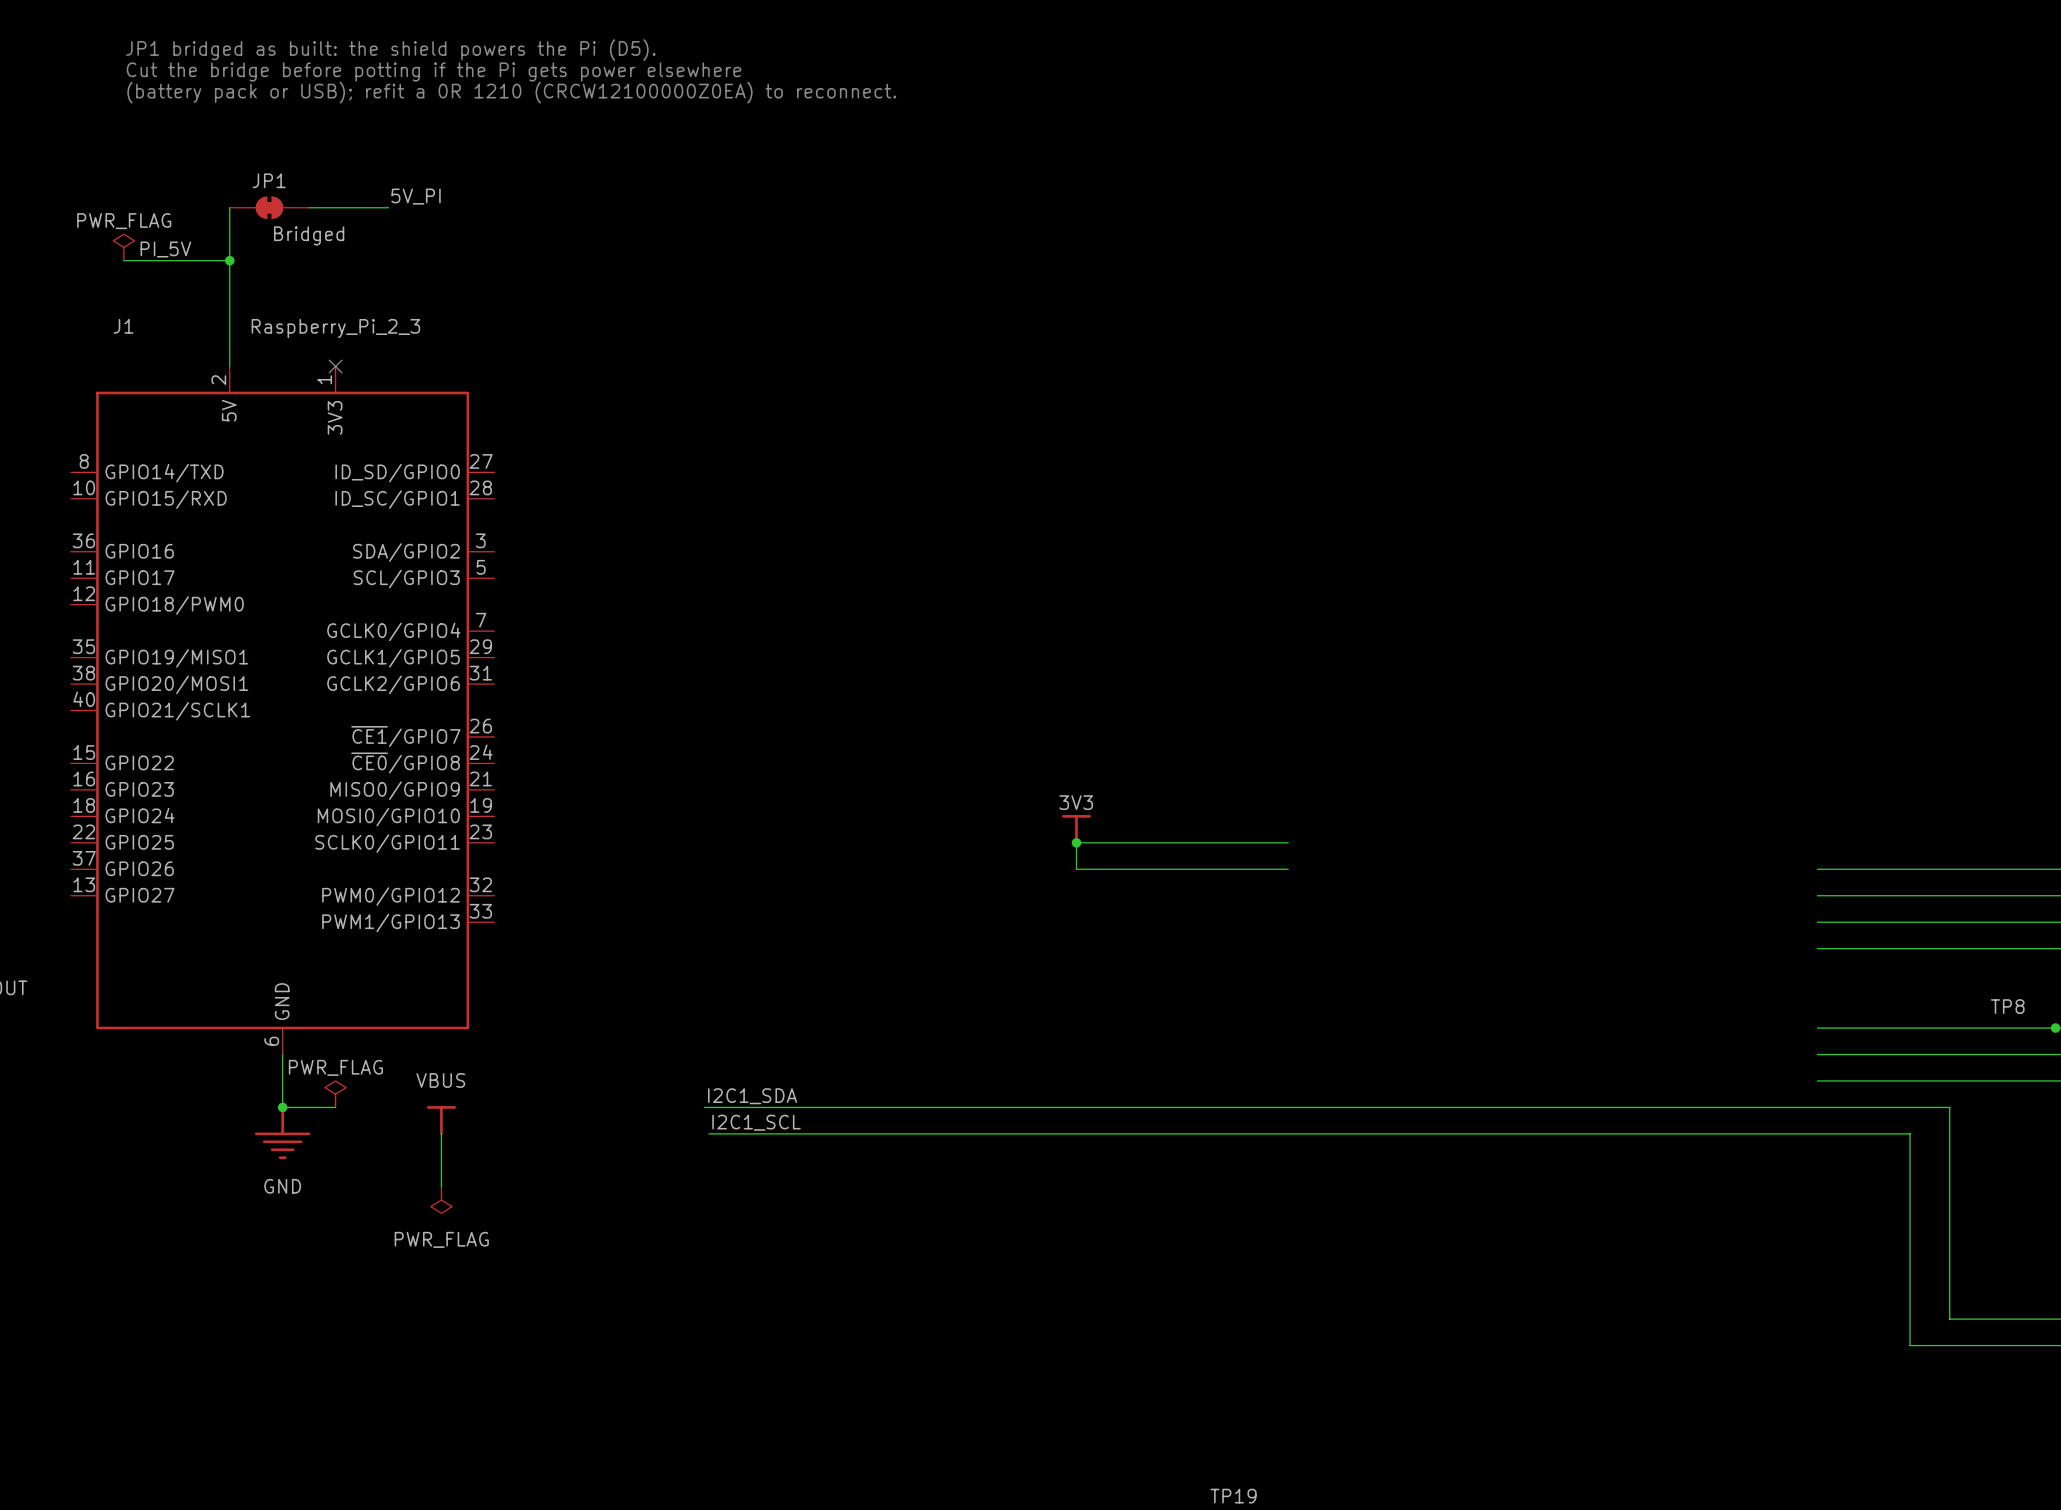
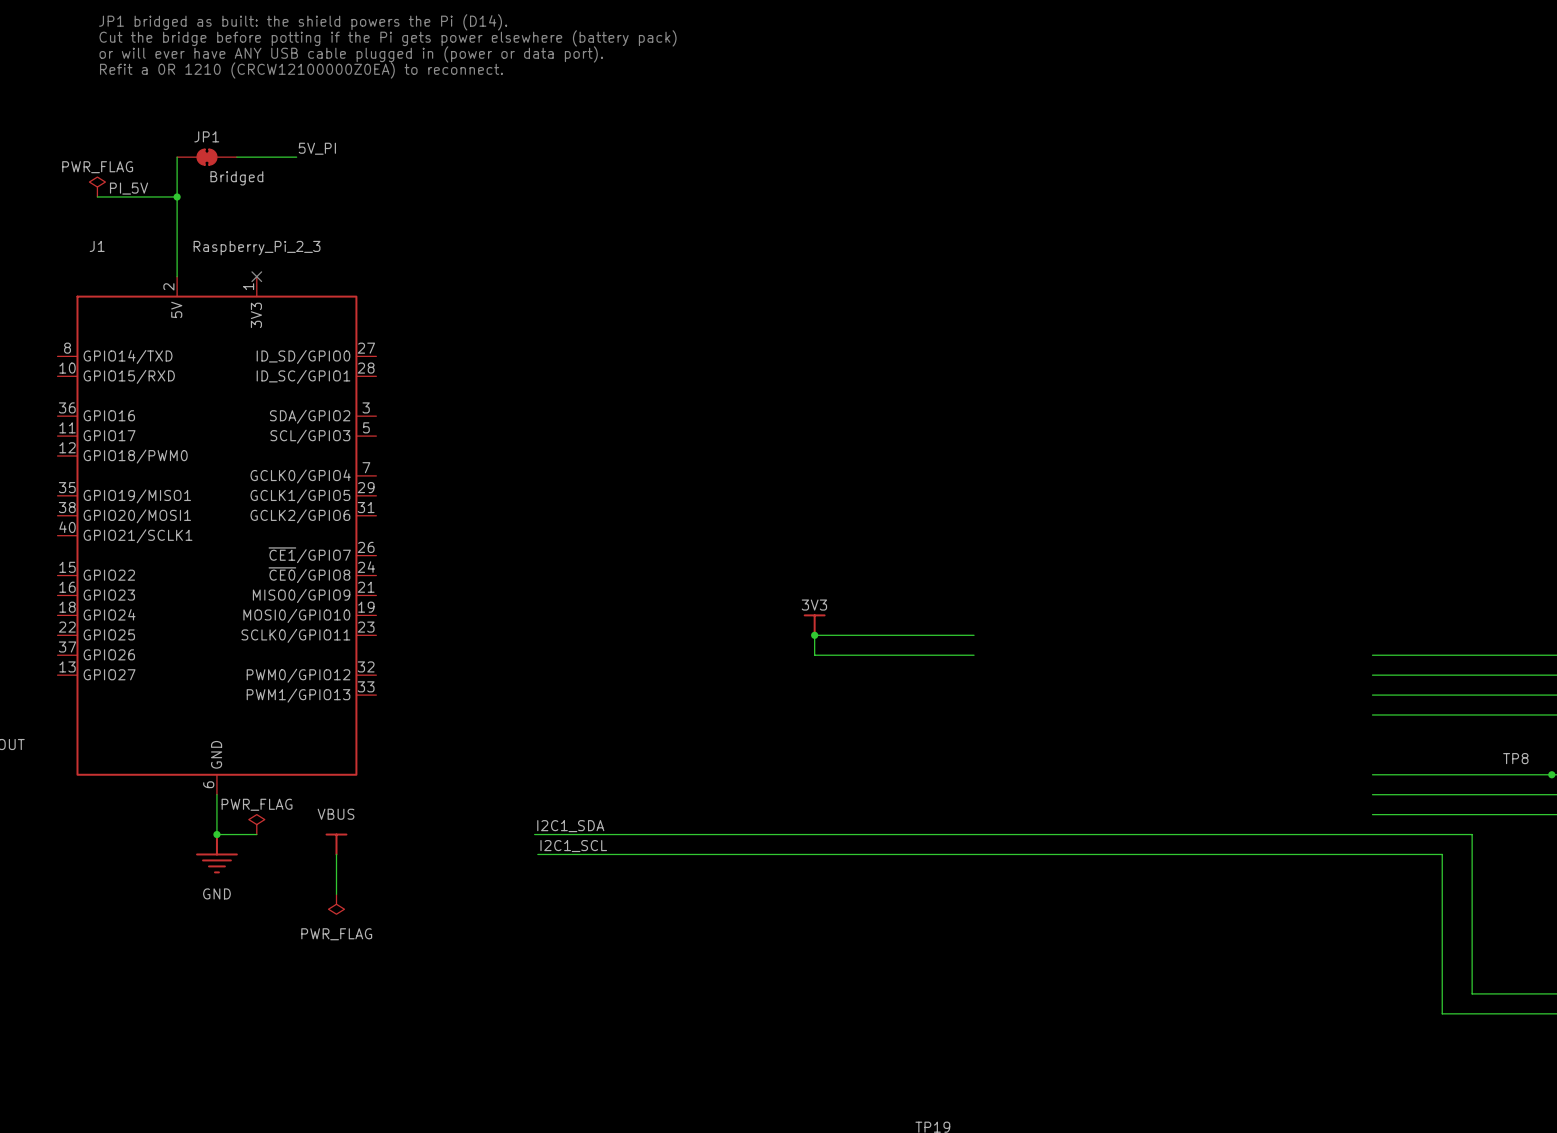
text: none -> JP1 bridged as built: the shield powers the Pi (D14). (303, 22)
text: JP1 bridged as built: the shield powers the Pi (D5). (390, 50) -> Cut the bridge before potting if the Pi gets power elsewhere (battery pack) (388, 38)
text: Cut the bridge before potting if the Pi gets power elsewhere (433, 71) -> or will ever have ANY USB cable plugged in (power or data port). (351, 54)
text: (battery pack or USB); refit a 0R 1210 (CRCW12100000Z0EA) to reconnect. (511, 92) -> Refit a 0R 1210 (CRCW12100000Z0EA) to reconnect. (301, 70)

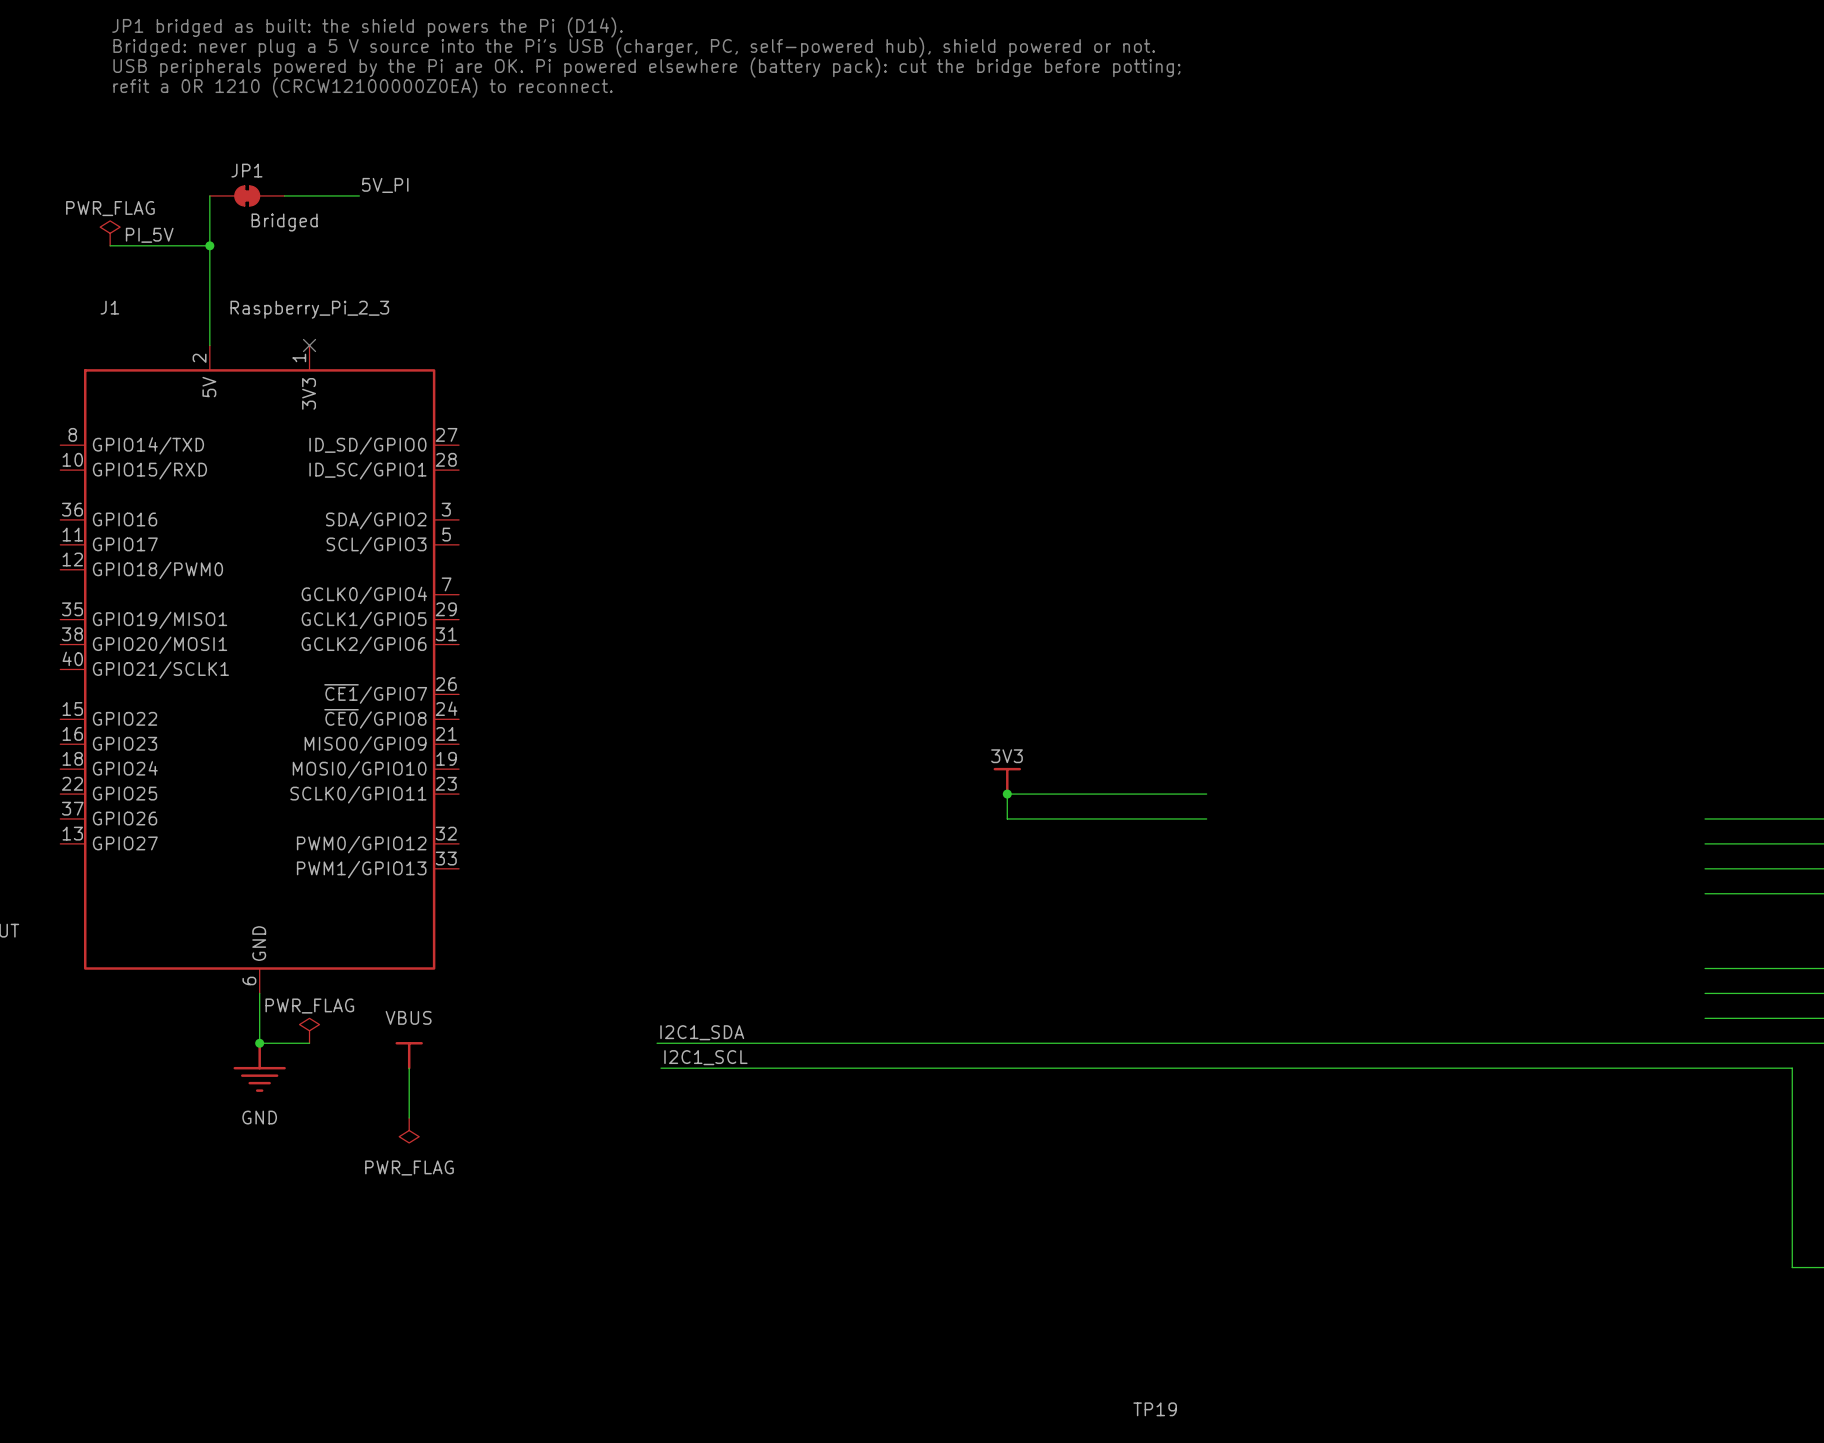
text: Cut the bridge before potting if the Pi gets power elsewhere (battery pack) (388, 38) -> Bridged: never plug a 5 V source into the Pi's USB (charger, PC, self-powered hub), shield powered or not. (634, 47)
text: or will ever have ANY USB cable plugged in (power or data port). (351, 54) -> USB peripherals powered by the Pi are OK. Pi powered elsewhere (battery pack): cut the bridge before potting; (646, 67)
text: Refit a 0R 1210 (CRCW12100000Z0EA) to reconnect. (301, 70) -> refit a 0R 1210 (CRCW12100000Z0EA) to reconnect. (363, 87)

